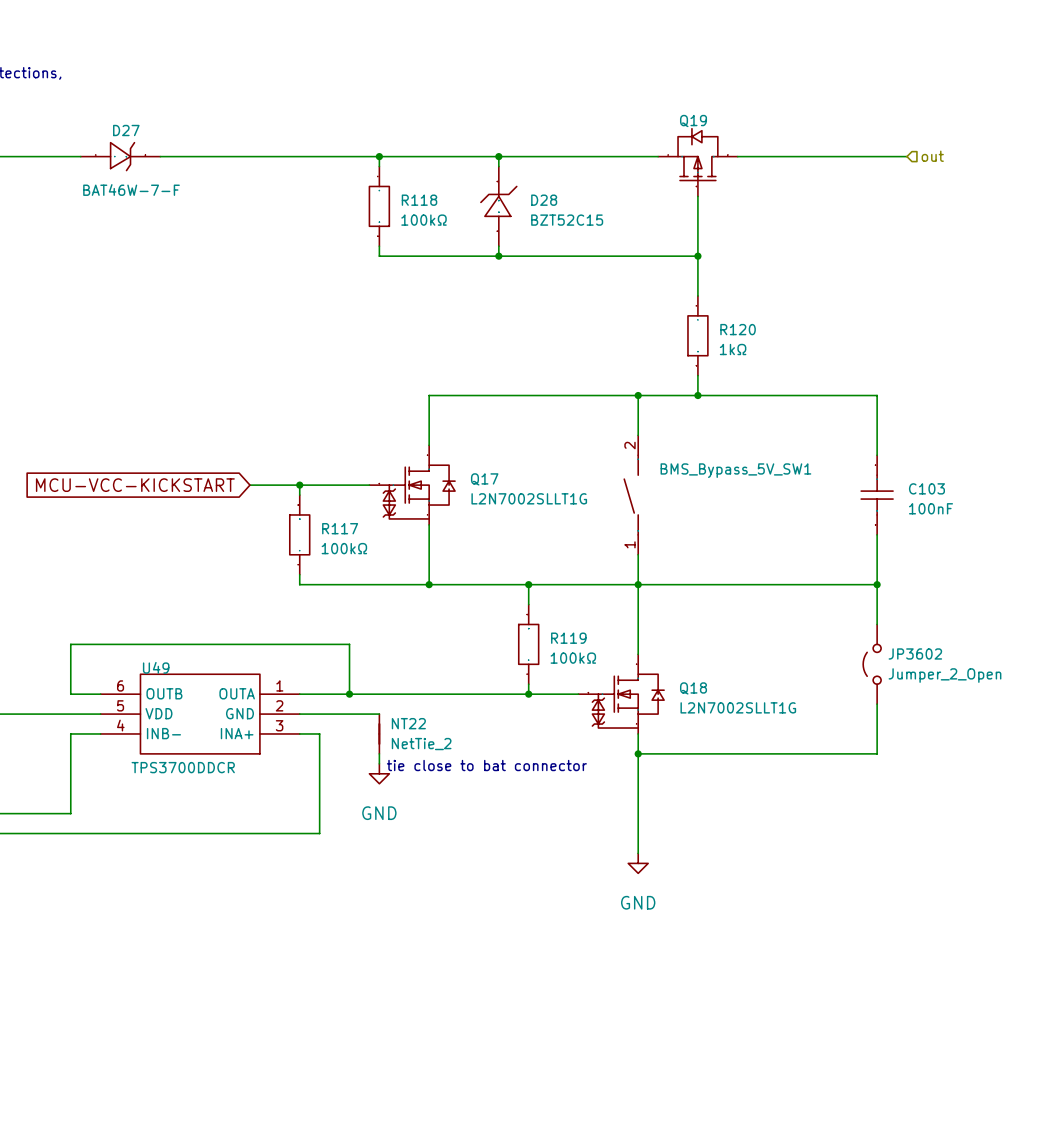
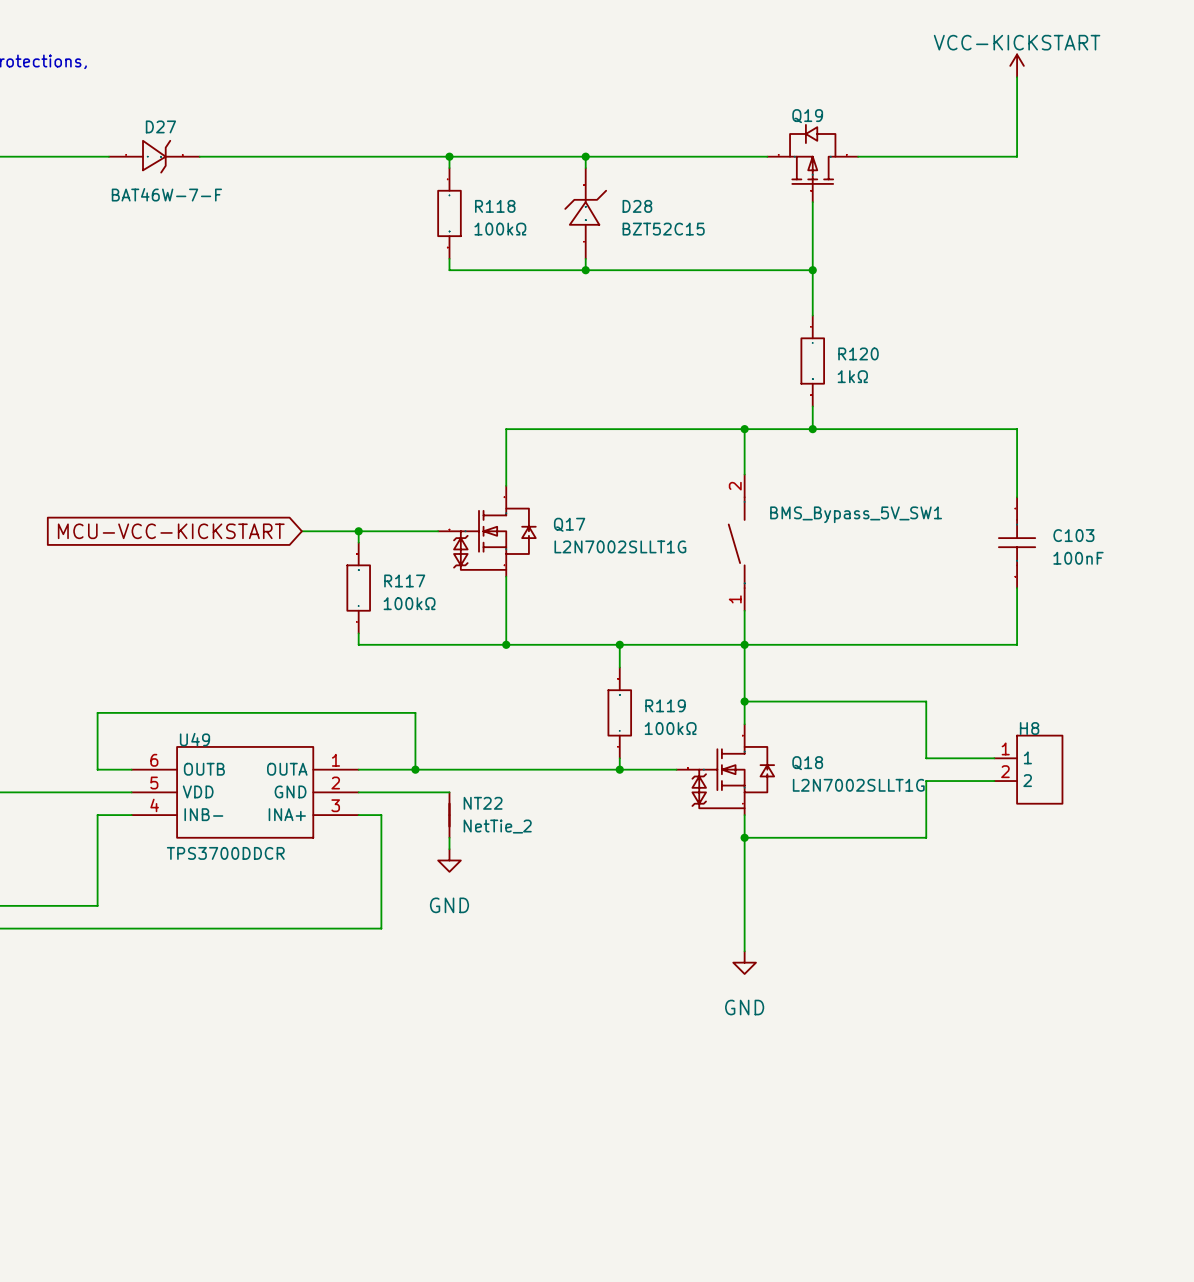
power symbol: none -> VCC-KICKSTART (1017, 65)
wire: (877, 156) (906, 156) -> (1017, 156) (1017, 77)
hierarchical label: out (932, 156) -> none
wire: (877, 584) (877, 624) -> none
junction: (877, 584) -> none
wire: none -> (744, 701) (926, 701) (926, 758) (994, 758)
junction: none -> (744, 701)
JP3602: Jumper_2_Open (872, 664) -> none
H8: none -> (1028, 769)
wire: (877, 704) (877, 753) (797, 753) -> (994, 781) (926, 781) (926, 837)
text: tie close to bat connector (486, 765) -> none

